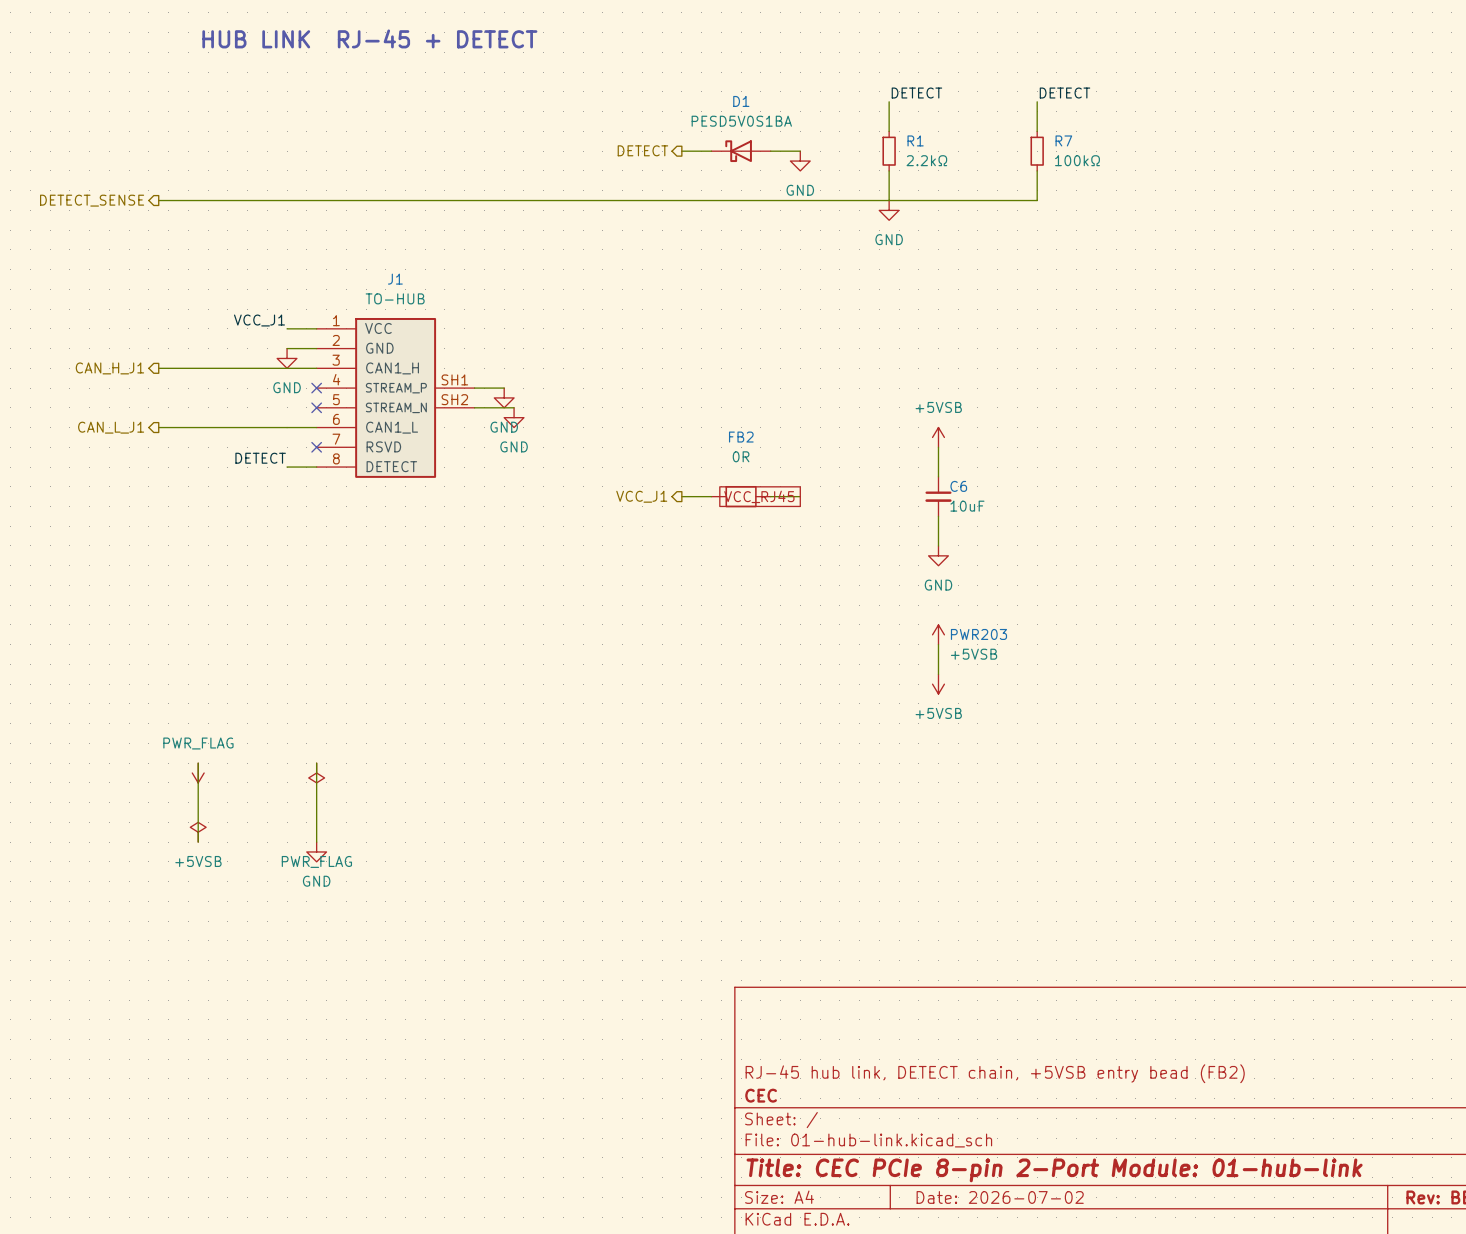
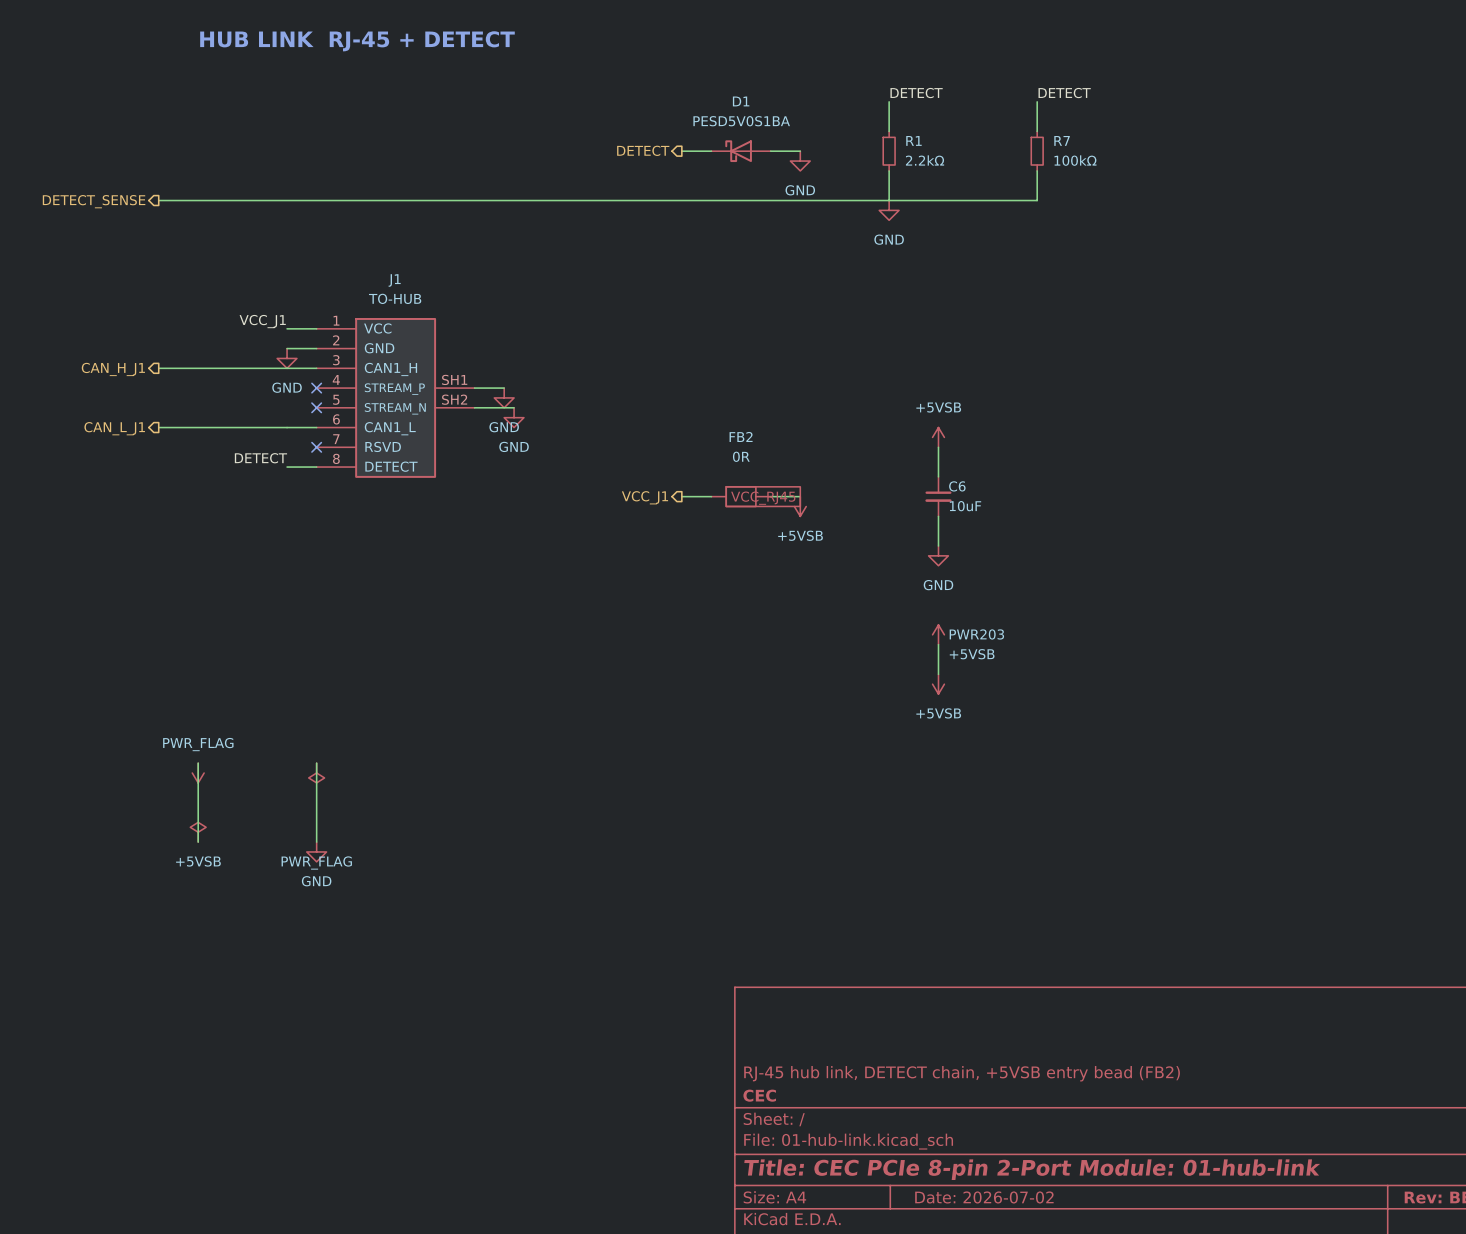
power symbol: none -> +5VSB (800, 506)

